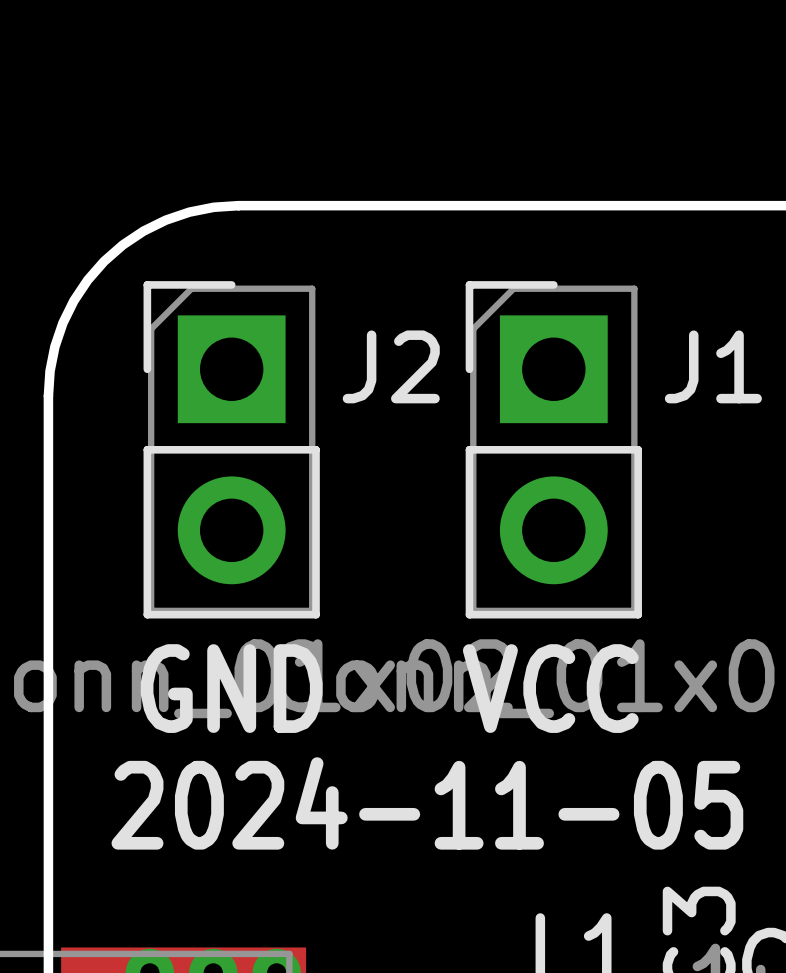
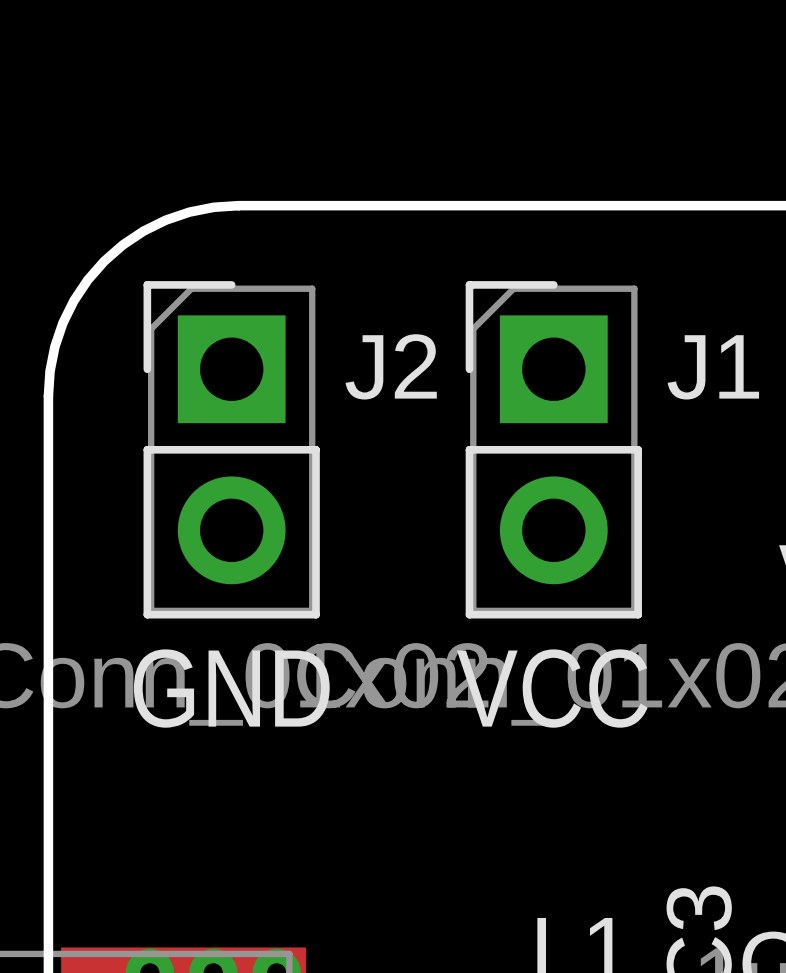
text: 2024-11-05 (427, 803) -> none

